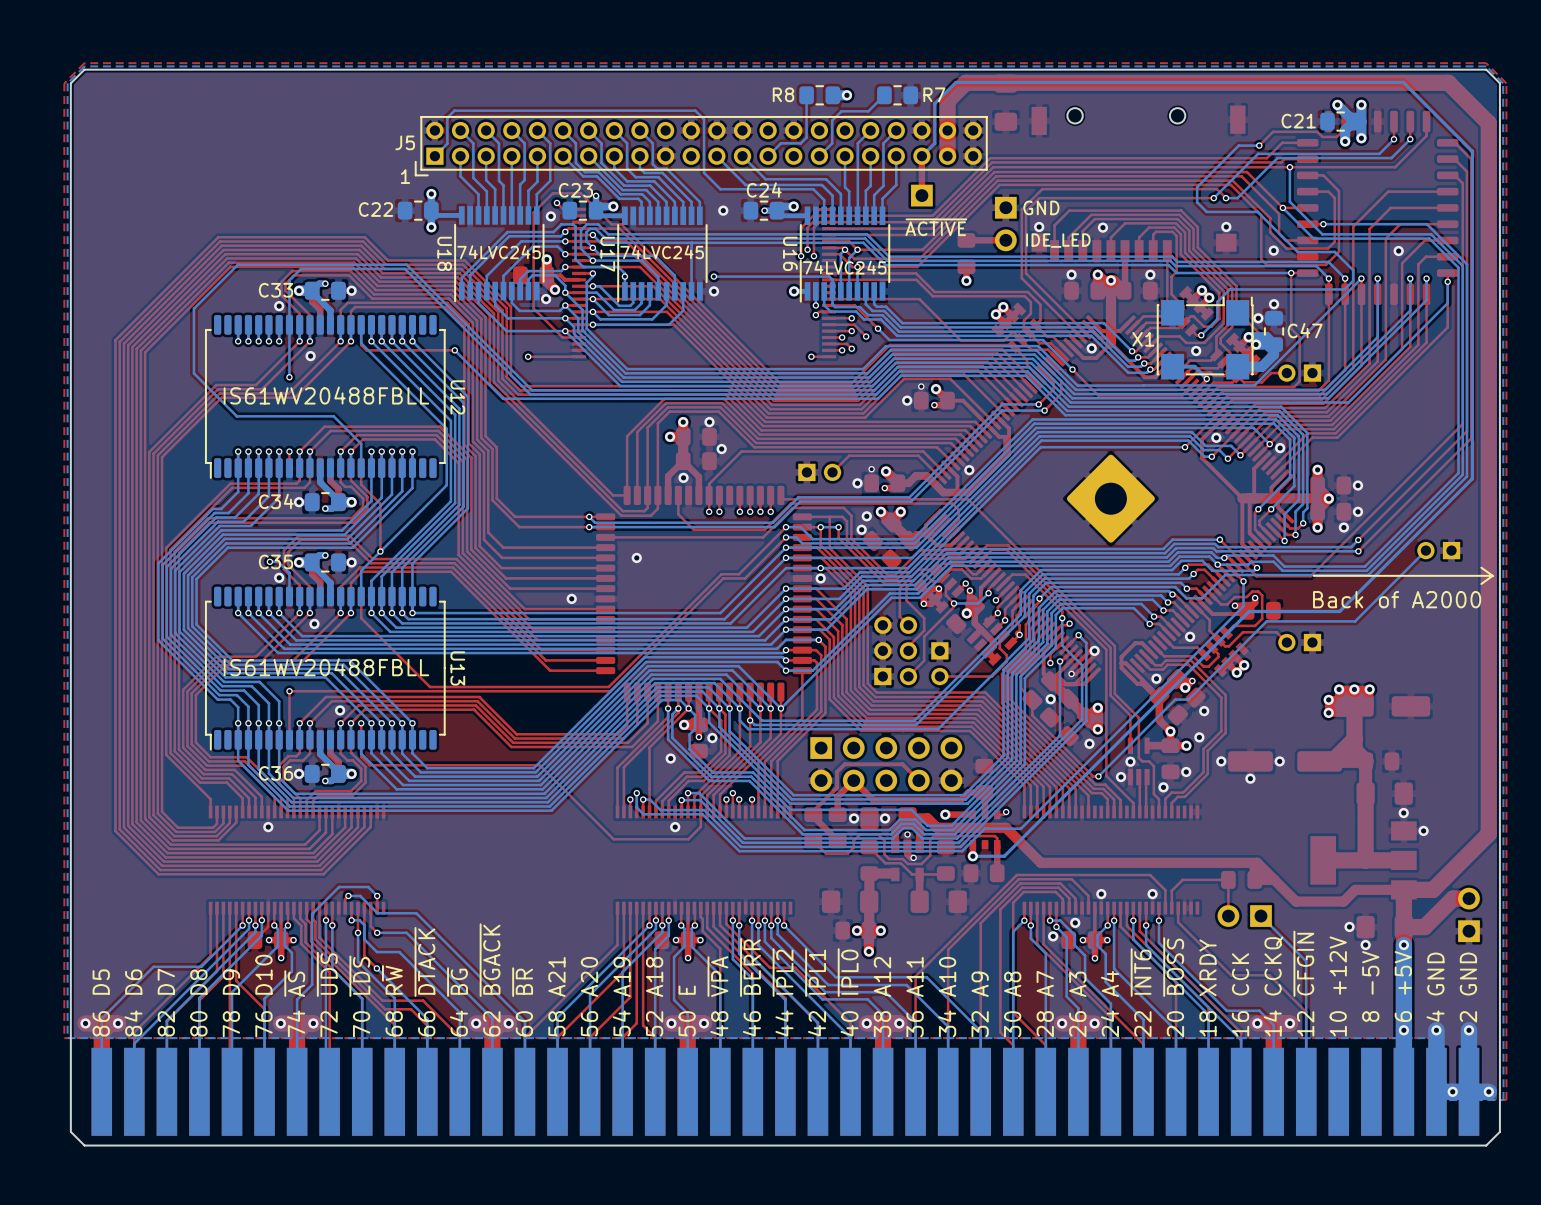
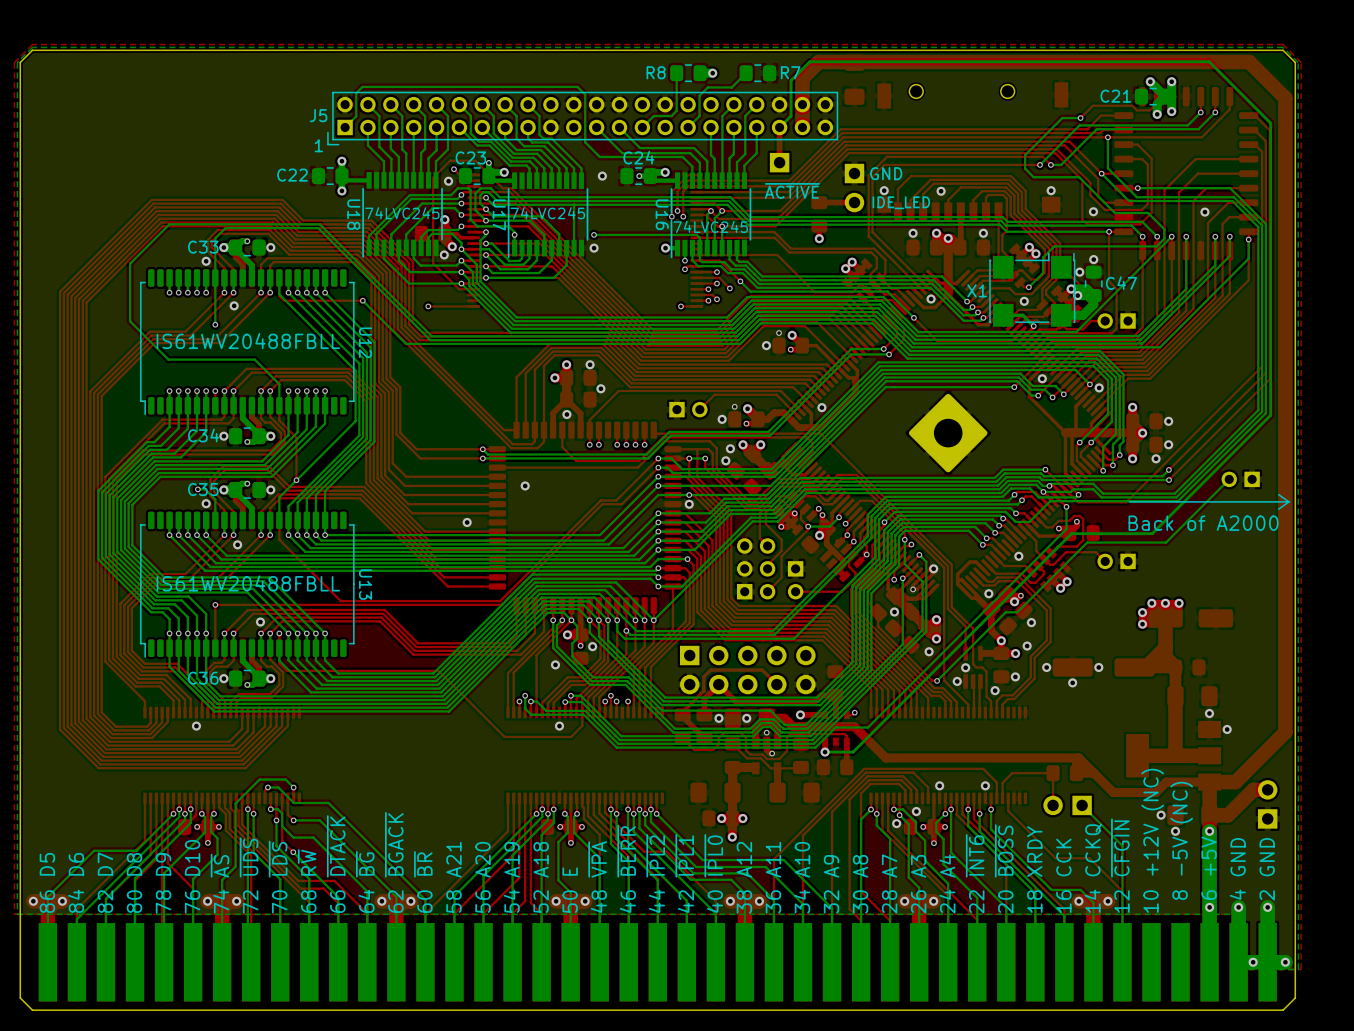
text: 10 +12V (1338, 986) -> 10 +12V (NC) (1152, 840)
text: 8 -5V (1370, 986) -> 8 -5V (NC) (1181, 840)

